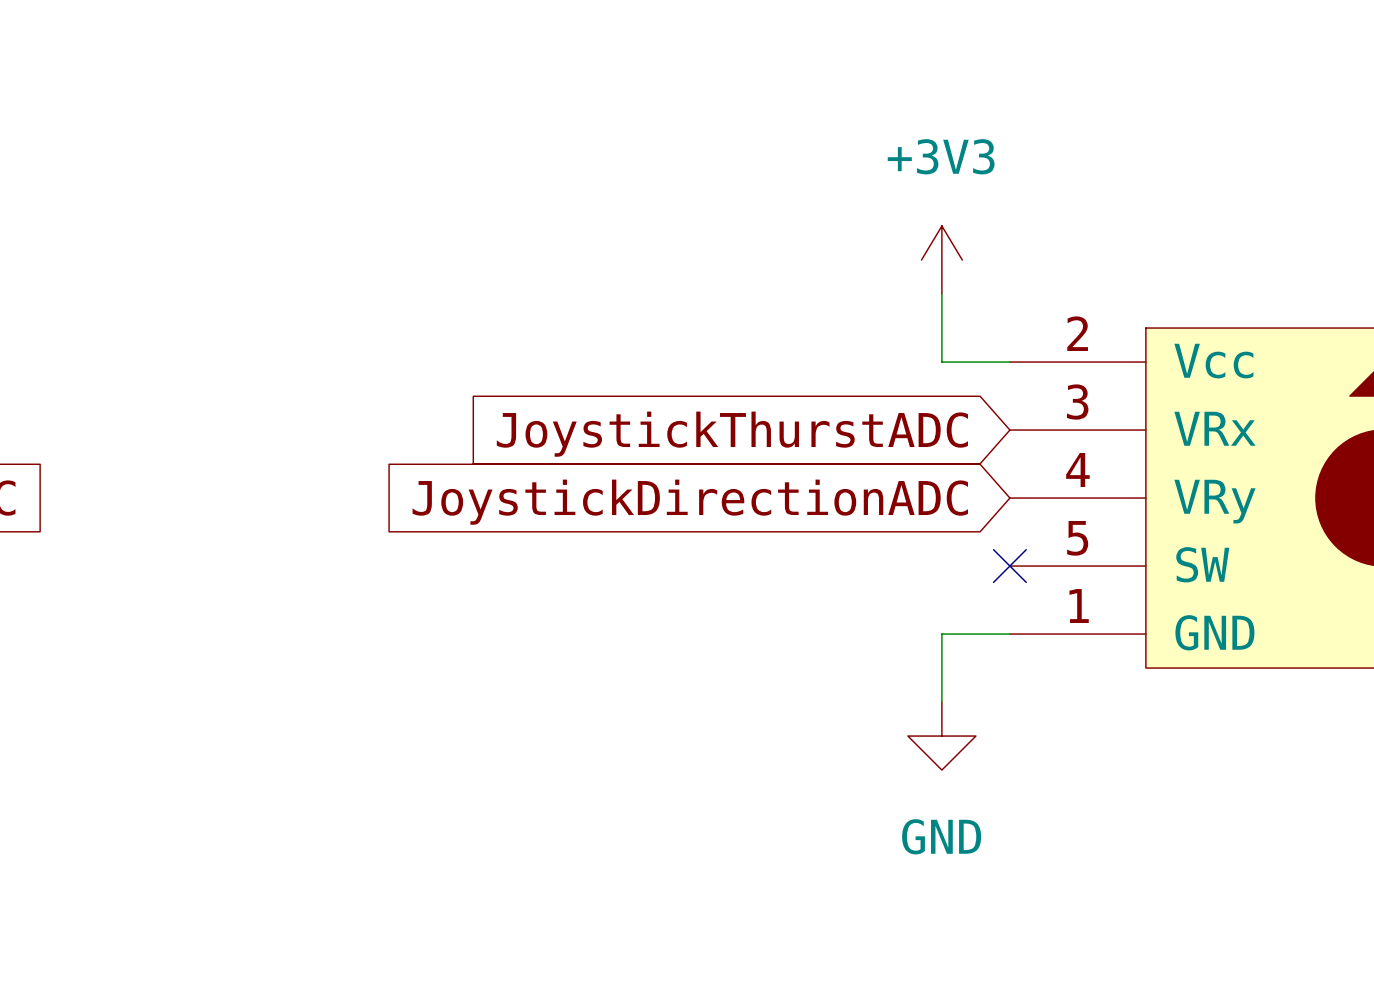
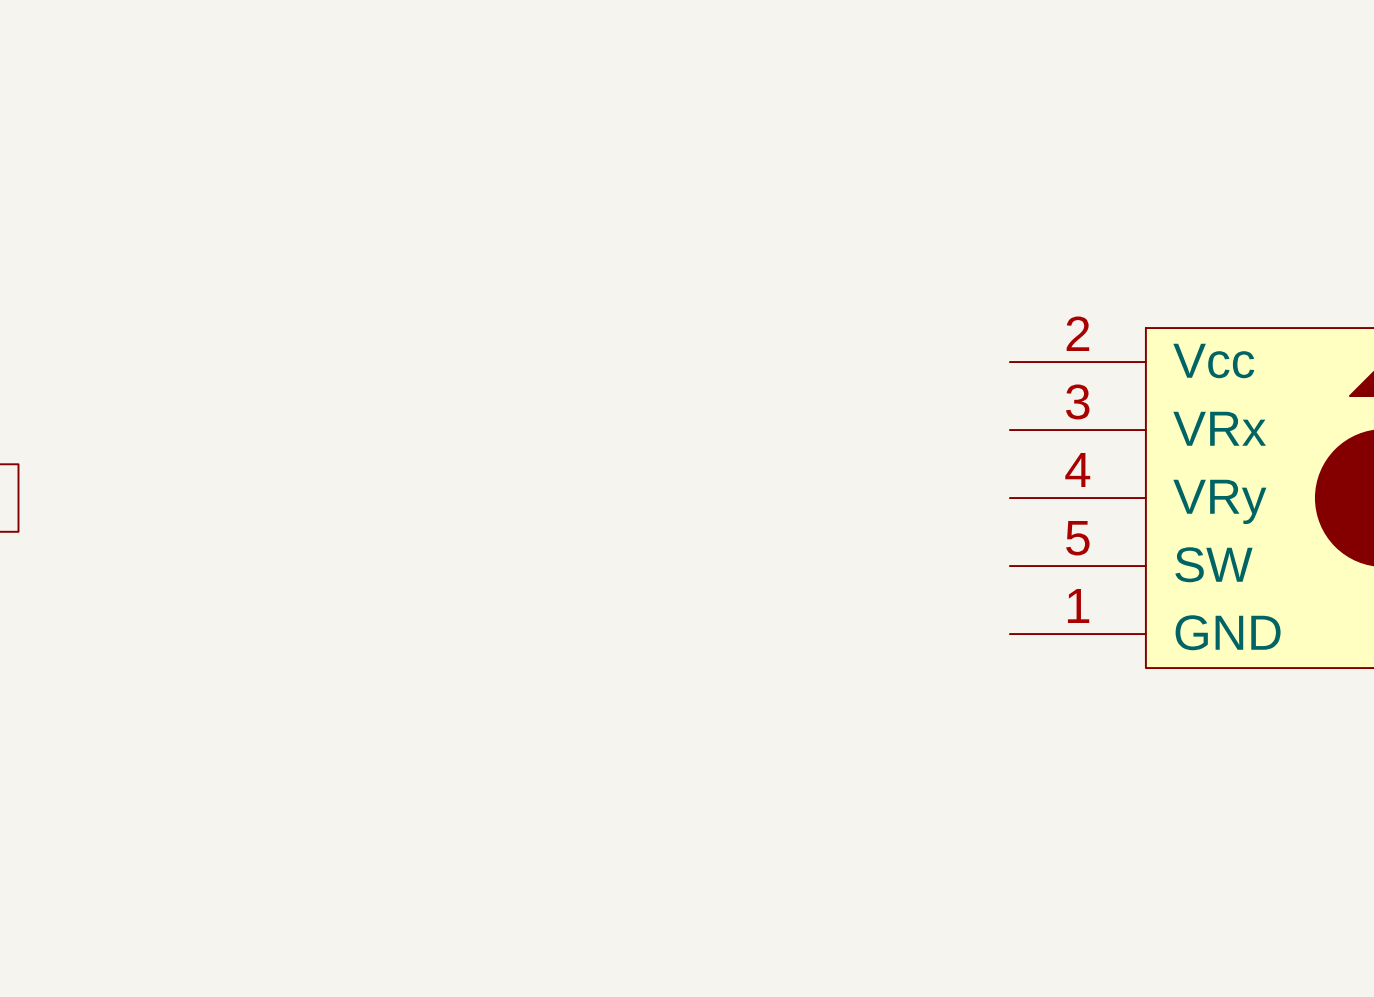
power symbol: +3V3 (941, 260) -> none
wire: (941, 294) (941, 362) (1009, 362) -> none
global label: JoystickThurstADC (732, 434) -> none
global label: JoystickDirectionADC (690, 502) -> none
no-connect mark: (1009, 566) -> none
wire: (1009, 634) (941, 634) (941, 702) -> none
power symbol: GND (941, 736) -> none

